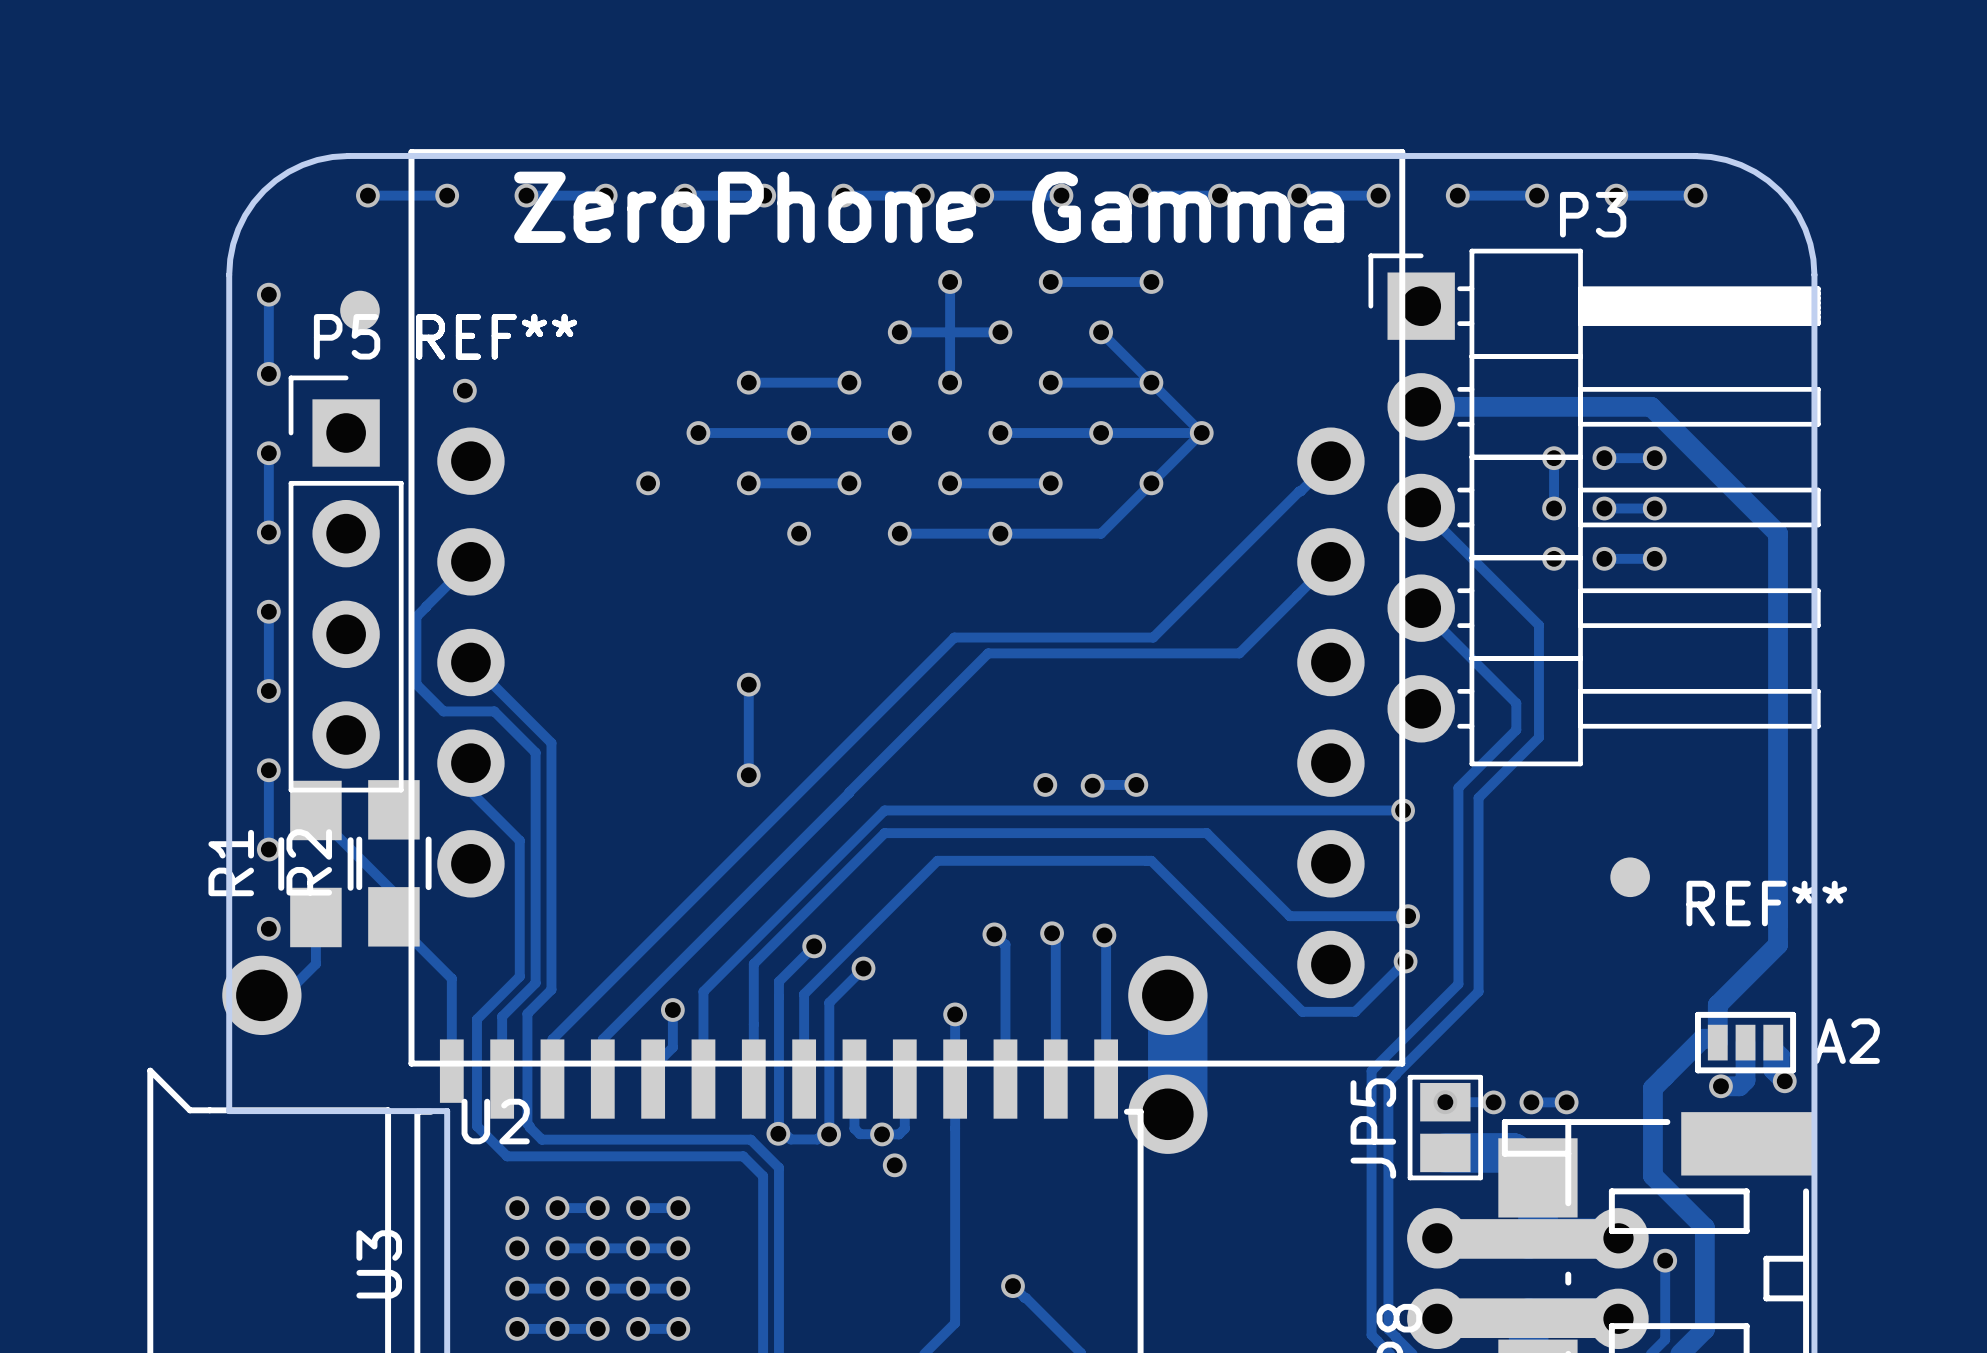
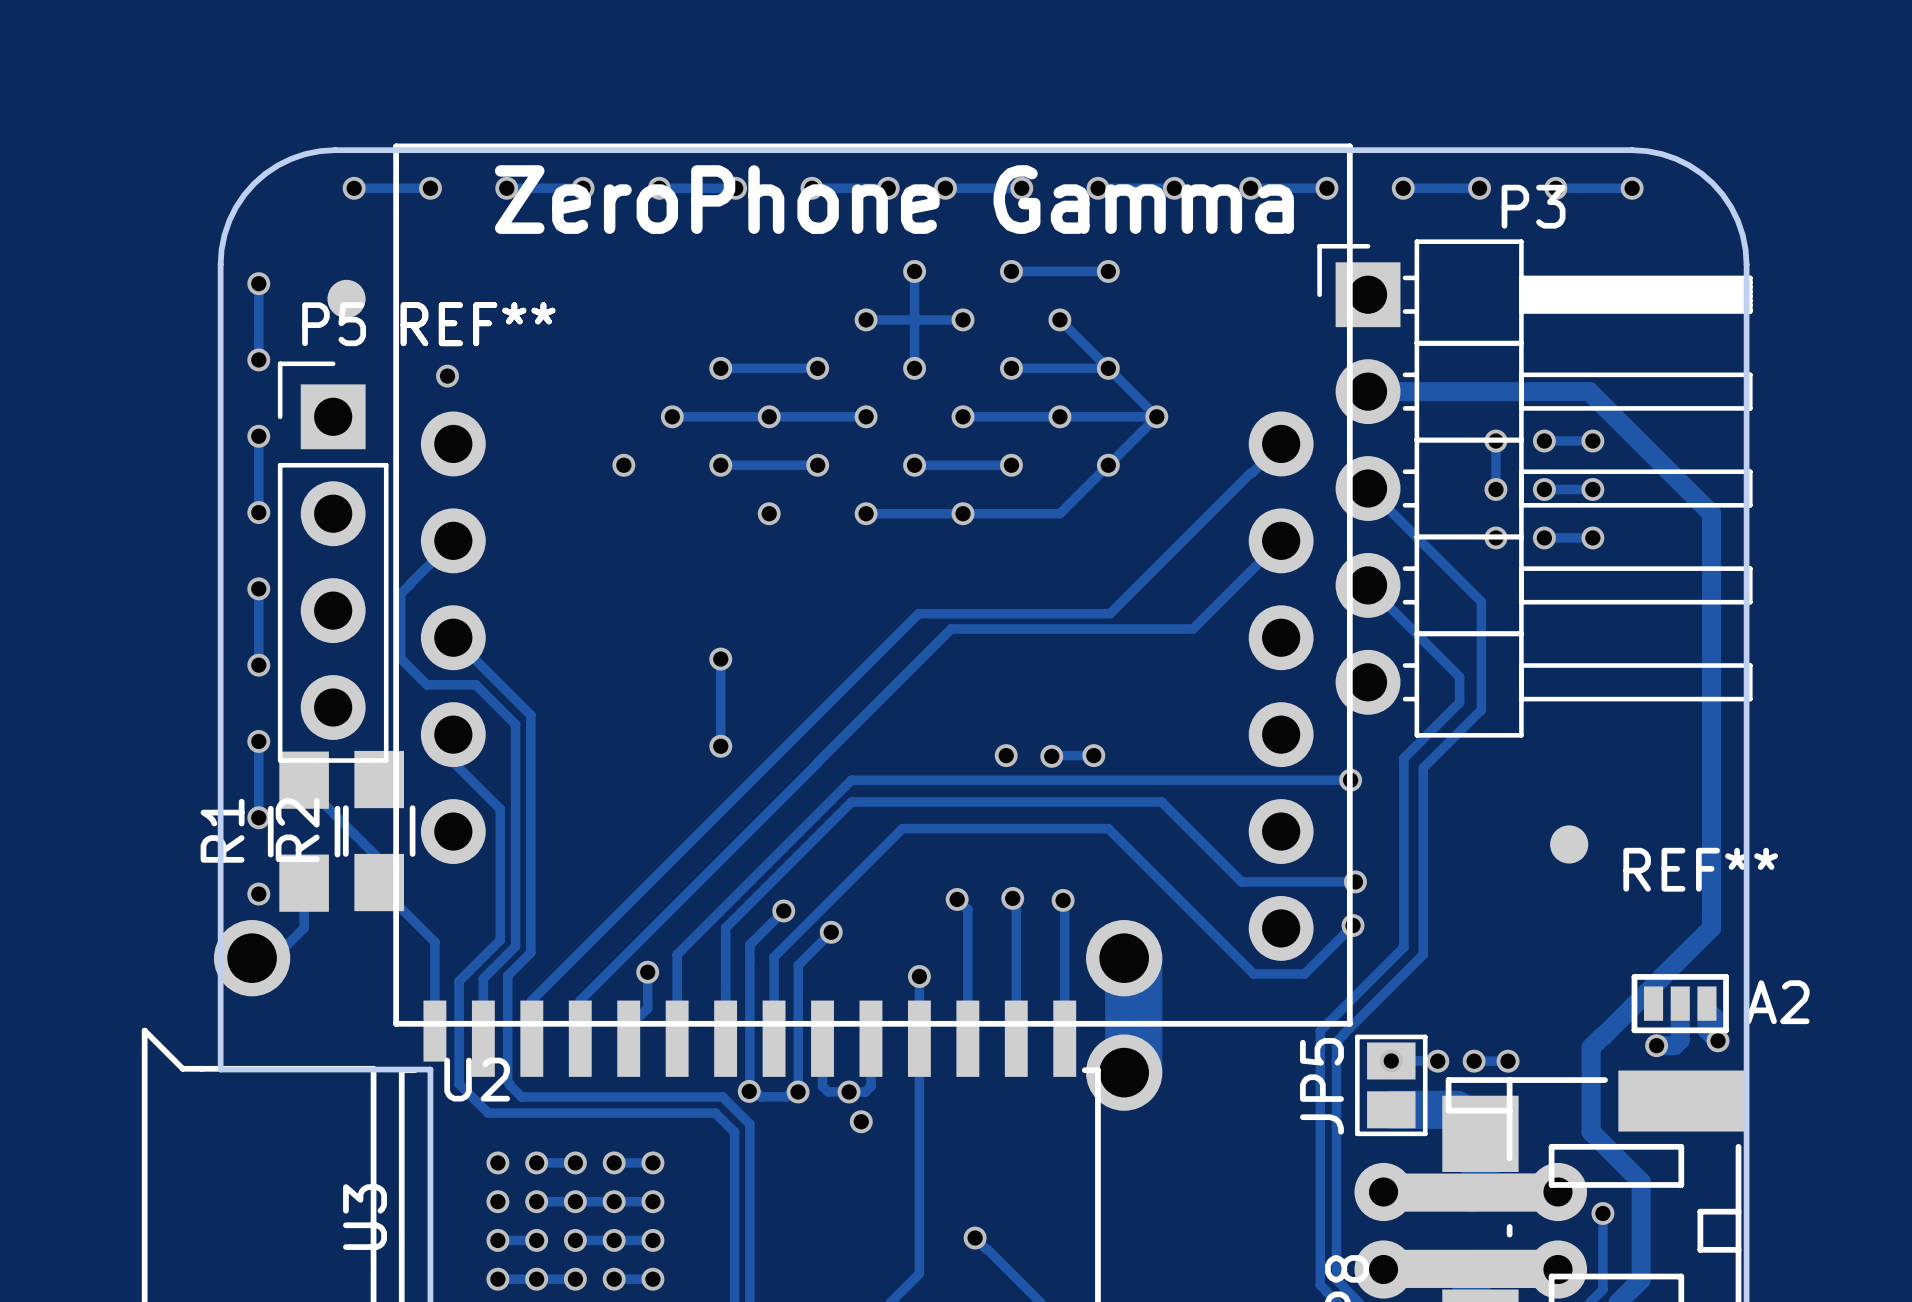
track: (1778, 944) (1717, 1004) (1717, 1042) (1713, 1038) (1702, 1038) (1664, 1076) -> (1711, 909) (1711, 927) (1662, 976)
track: none -> (1653, 985) (1662, 977) (1603, 1036)

